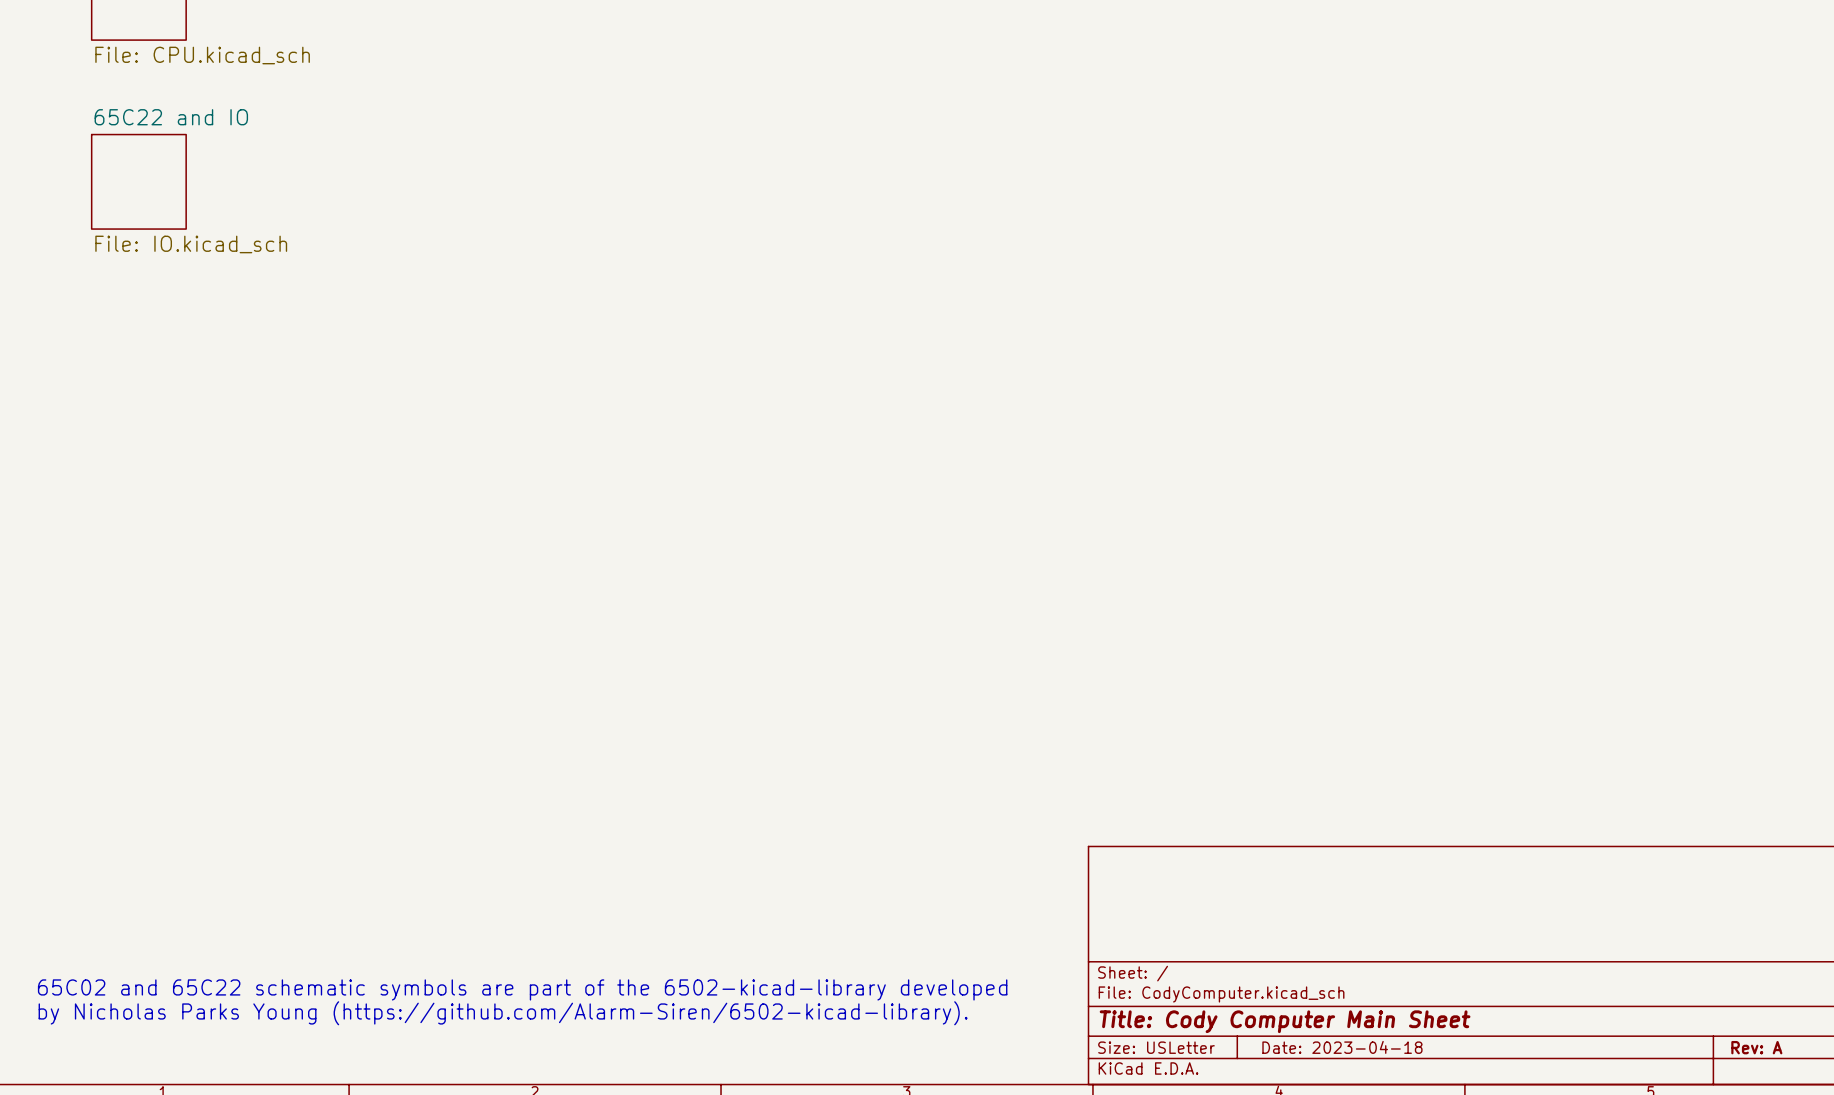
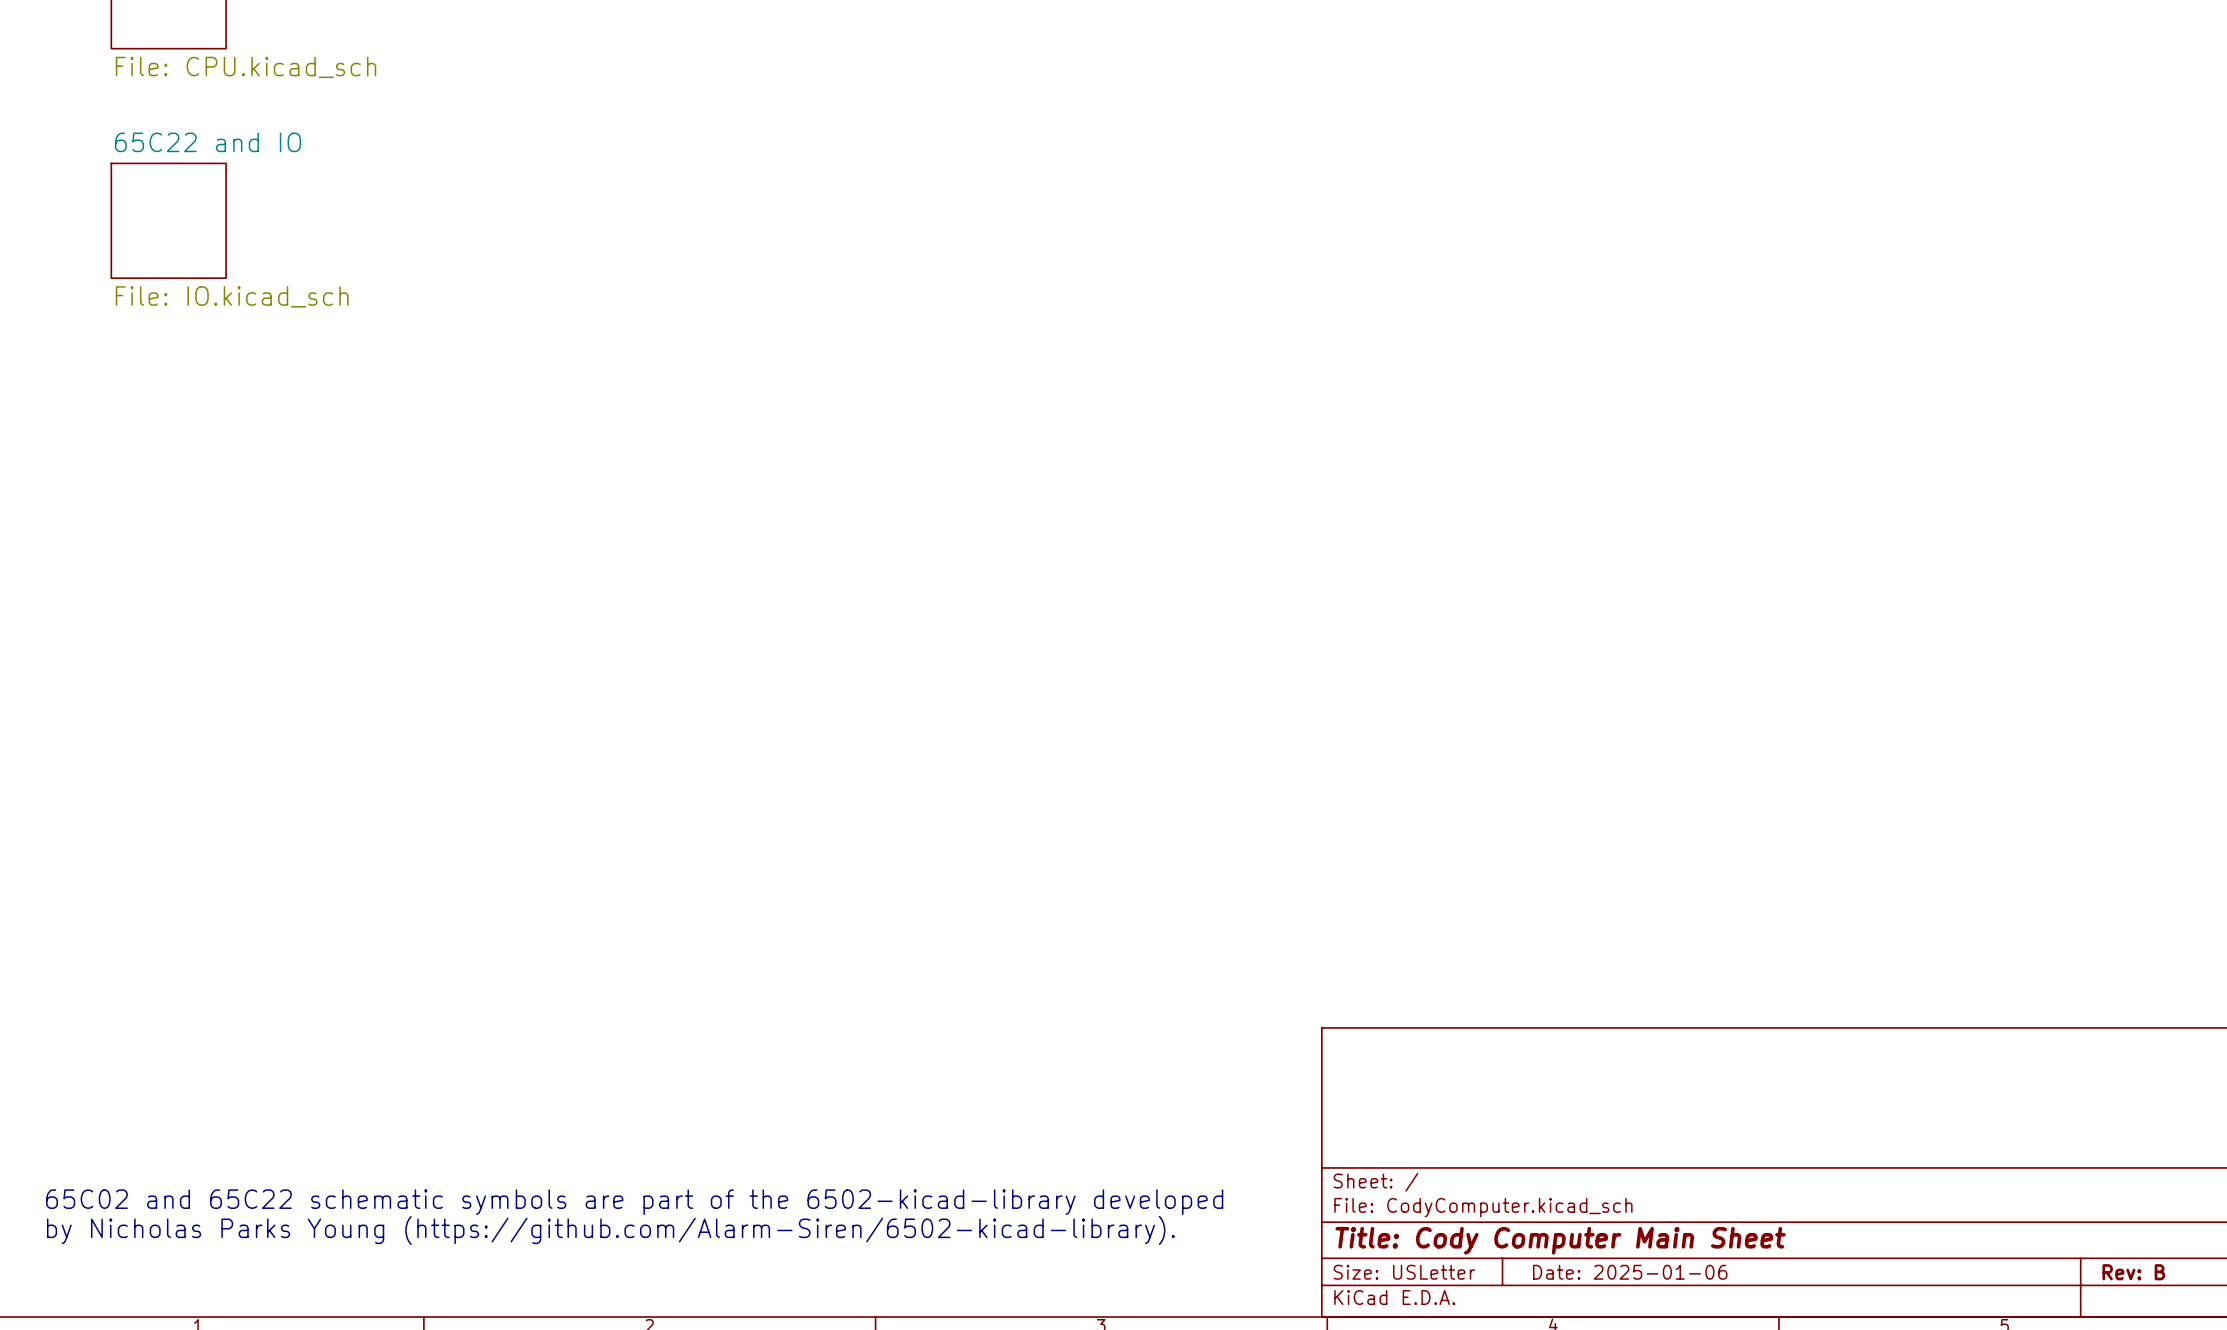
title block: Date: 2023-04-18 (1342, 1047) -> Date: 2025-01-06 (1630, 1272)
title block: Rev: A (1756, 1047) -> Rev: B (2133, 1272)

